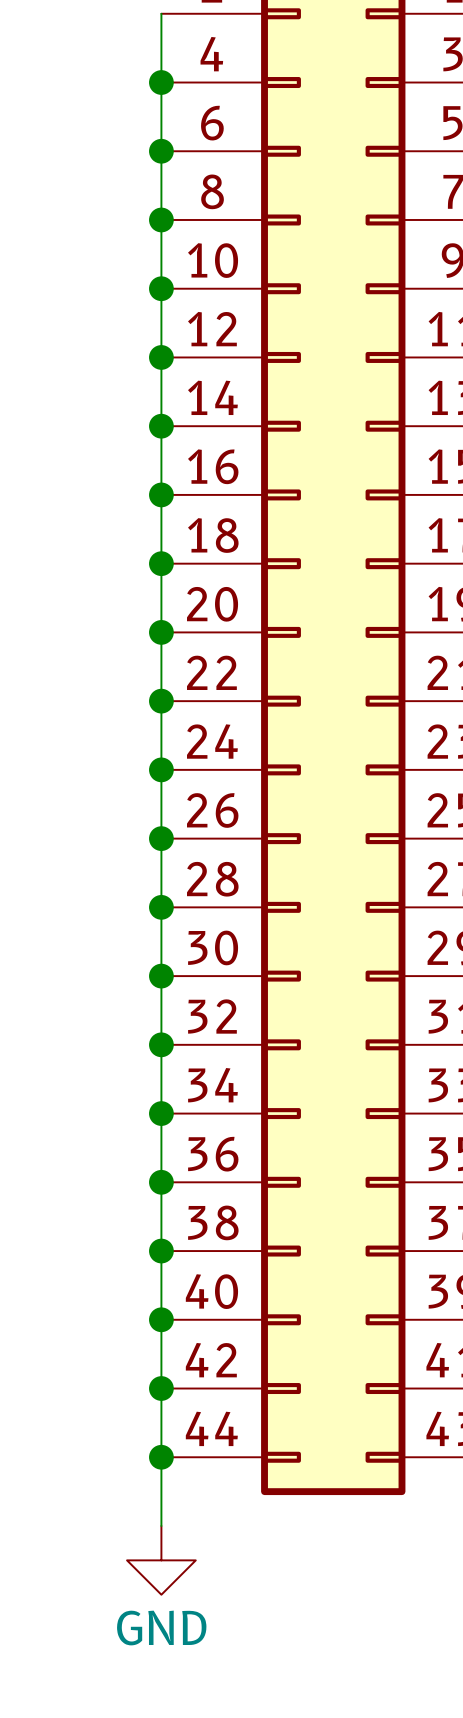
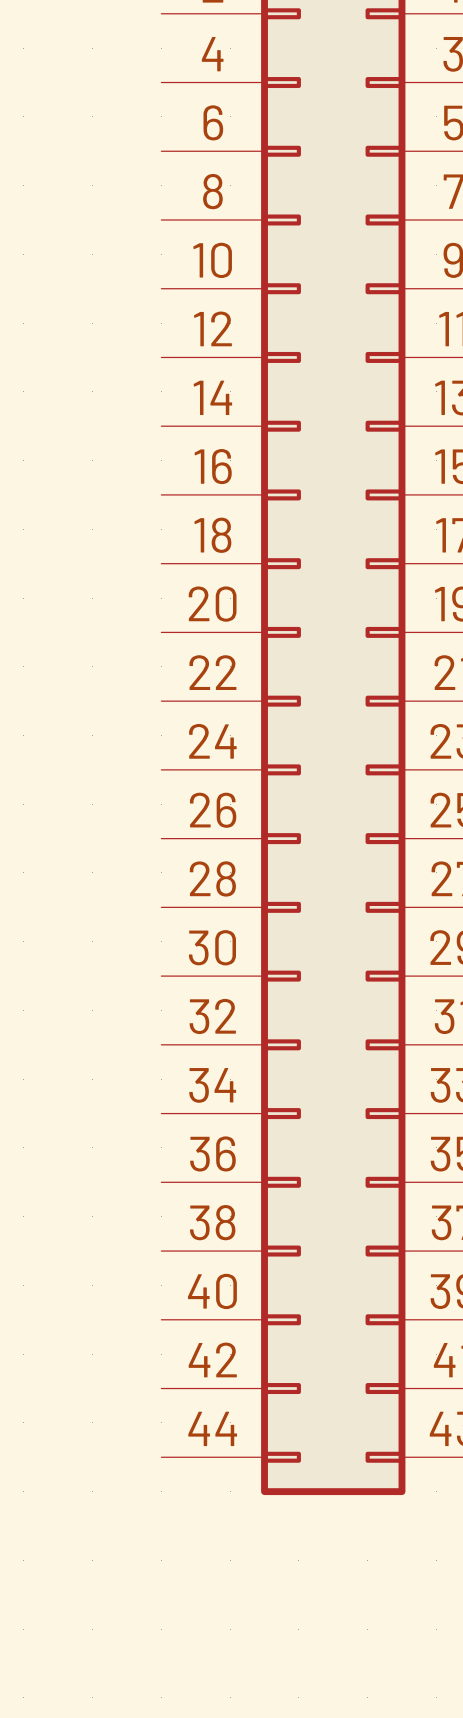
wire: (161, 13) (161, 1525) -> none
junction: (161, 82) -> none
junction: (161, 151) -> none
junction: (161, 219) -> none
junction: (161, 288) -> none
junction: (161, 357) -> none
junction: (161, 426) -> none
junction: (161, 494) -> none
junction: (161, 563) -> none
junction: (161, 632) -> none
junction: (161, 701) -> none
junction: (161, 769) -> none
junction: (161, 838) -> none
junction: (161, 907) -> none
junction: (161, 976) -> none
junction: (161, 1044) -> none
junction: (161, 1113) -> none
junction: (161, 1182) -> none
junction: (161, 1251) -> none
junction: (161, 1319) -> none
junction: (161, 1388) -> none
junction: (161, 1457) -> none
power symbol: GND (161, 1560) -> none

